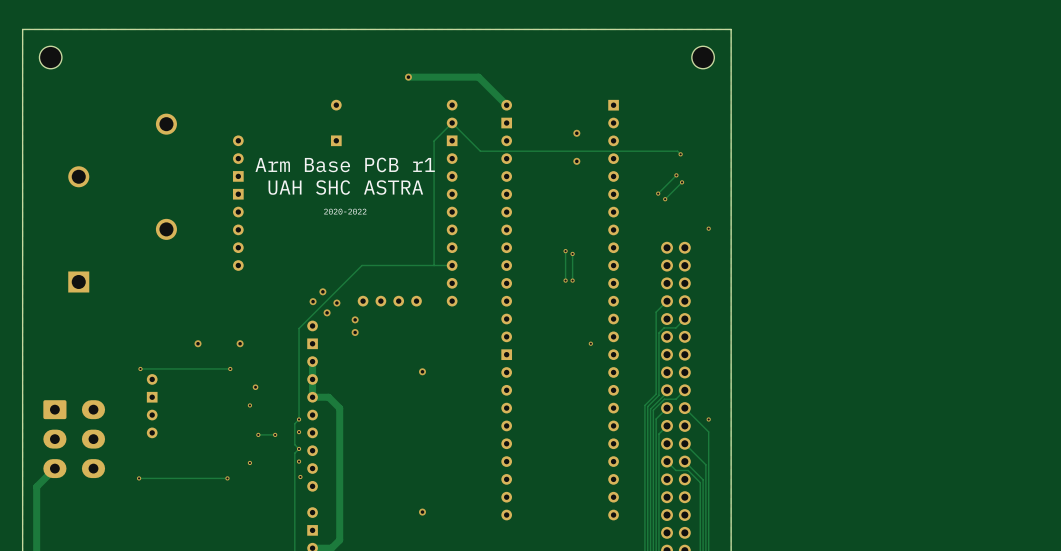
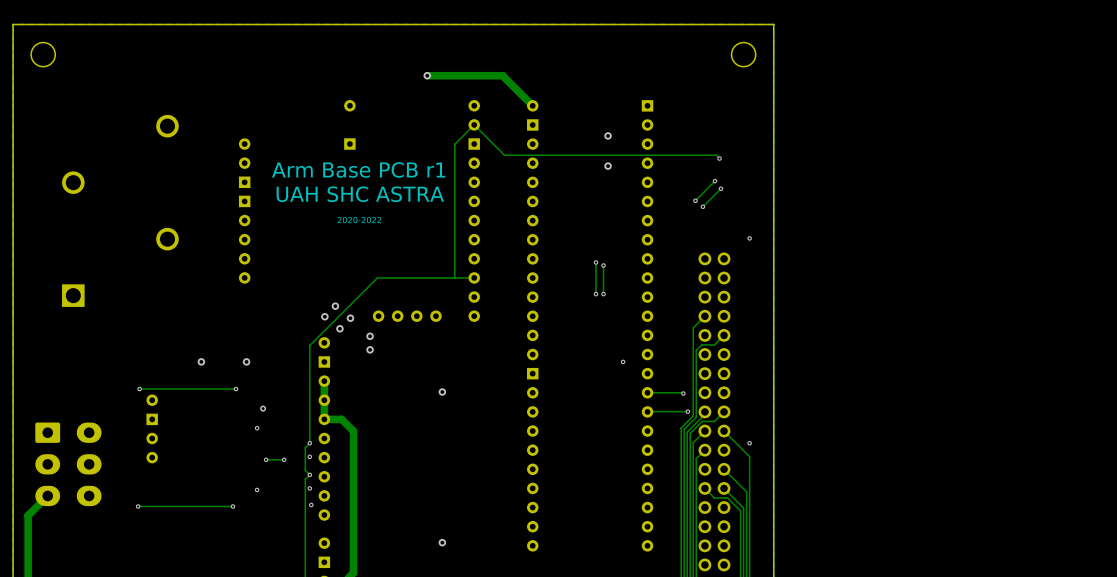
track: none -> (647, 392) (683, 393)
via: none -> (683, 393)
track: none -> (687, 411) (647, 411)
via: none -> (687, 411)

